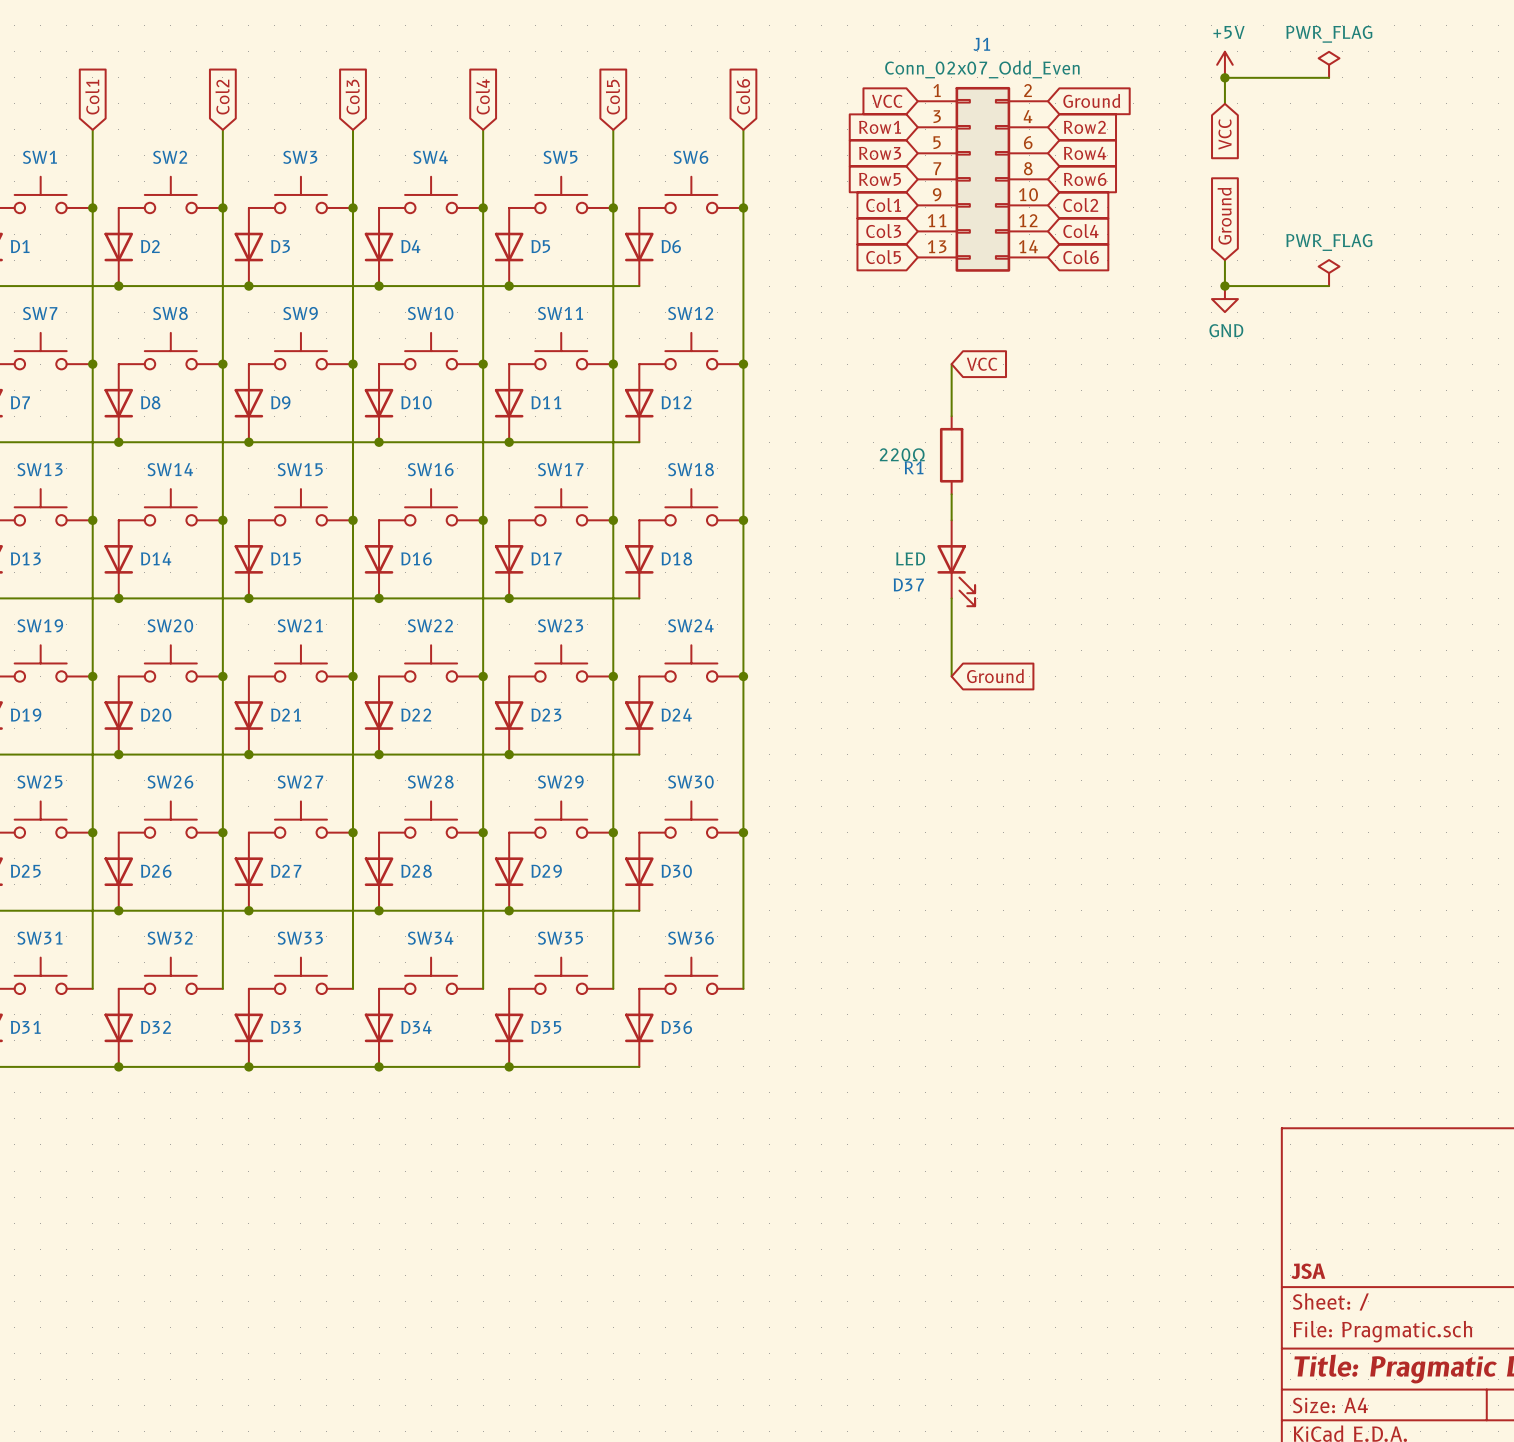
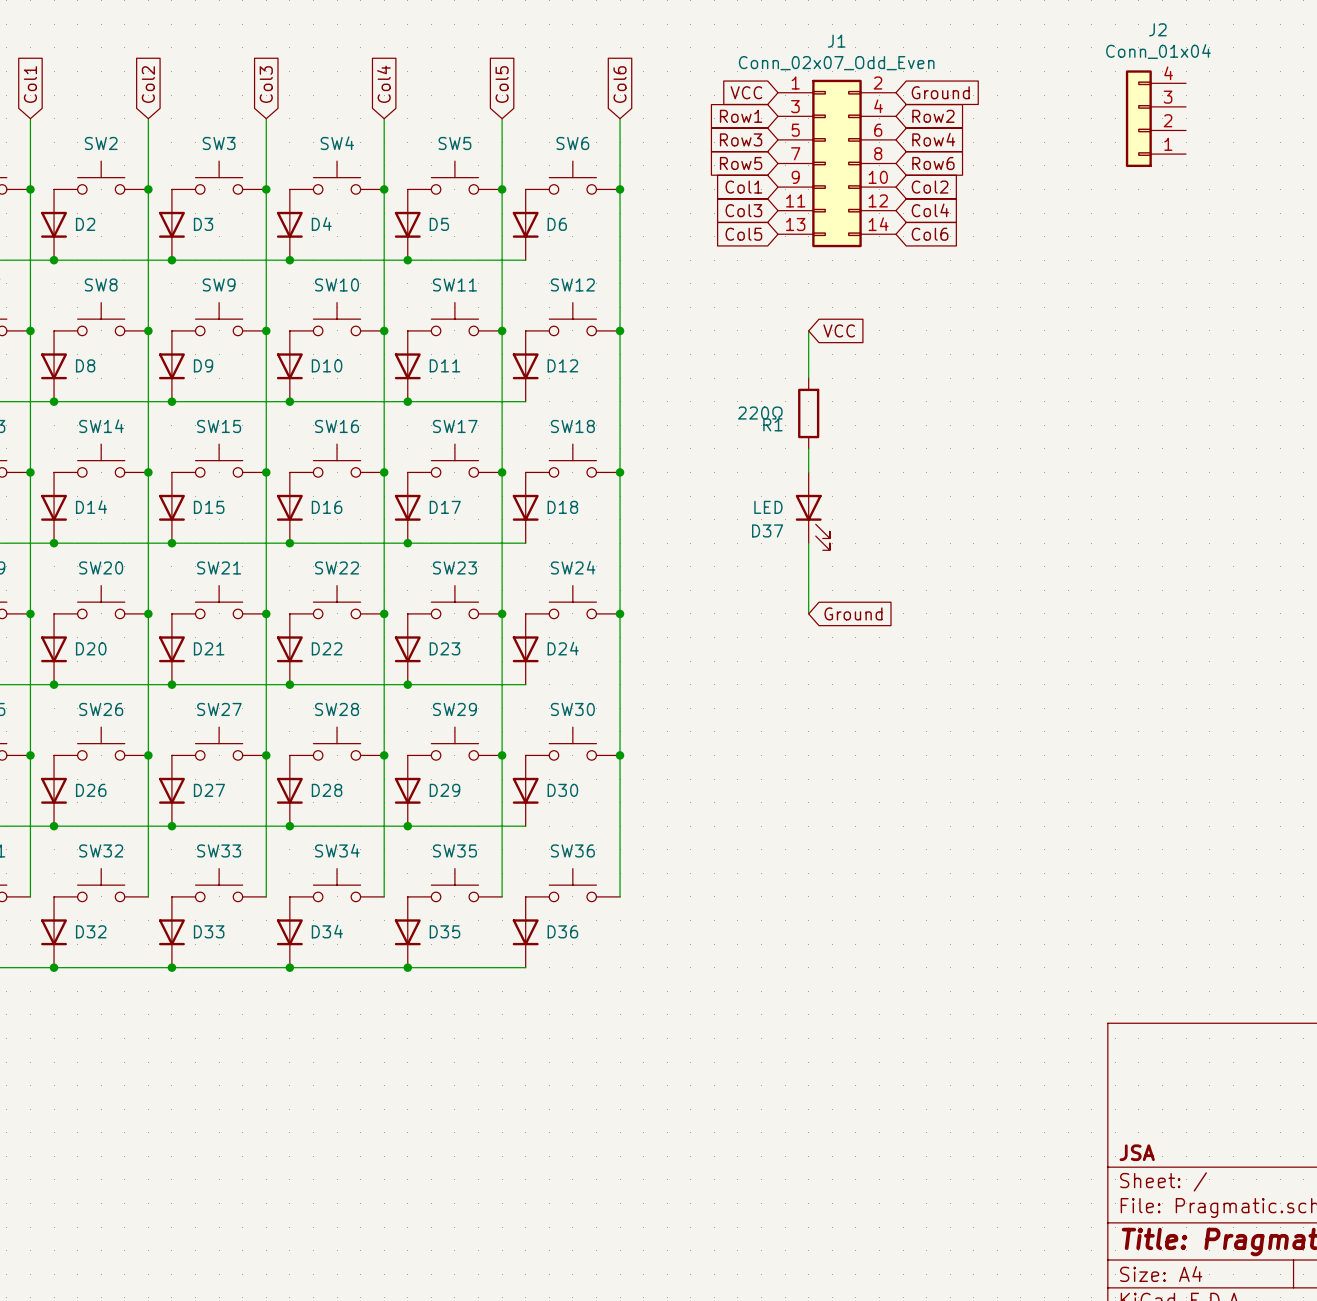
power symbol: +5V (1224, 64) -> none
power symbol: PWR_FLAG (1329, 64) -> none
junction: (1224, 77) -> none
wire: (1329, 77) (1224, 77) (1224, 103) -> none
J2: none -> Conn_01x04 (1155, 118)
global label: VCC (1225, 134) -> none
global label: Ground (1224, 216) -> none
wire: (1224, 260) (1224, 286) (1329, 286) -> none
power symbol: PWR_FLAG (1329, 273) -> none
junction: (1224, 286) -> none
power symbol: GND (1224, 299) -> none

